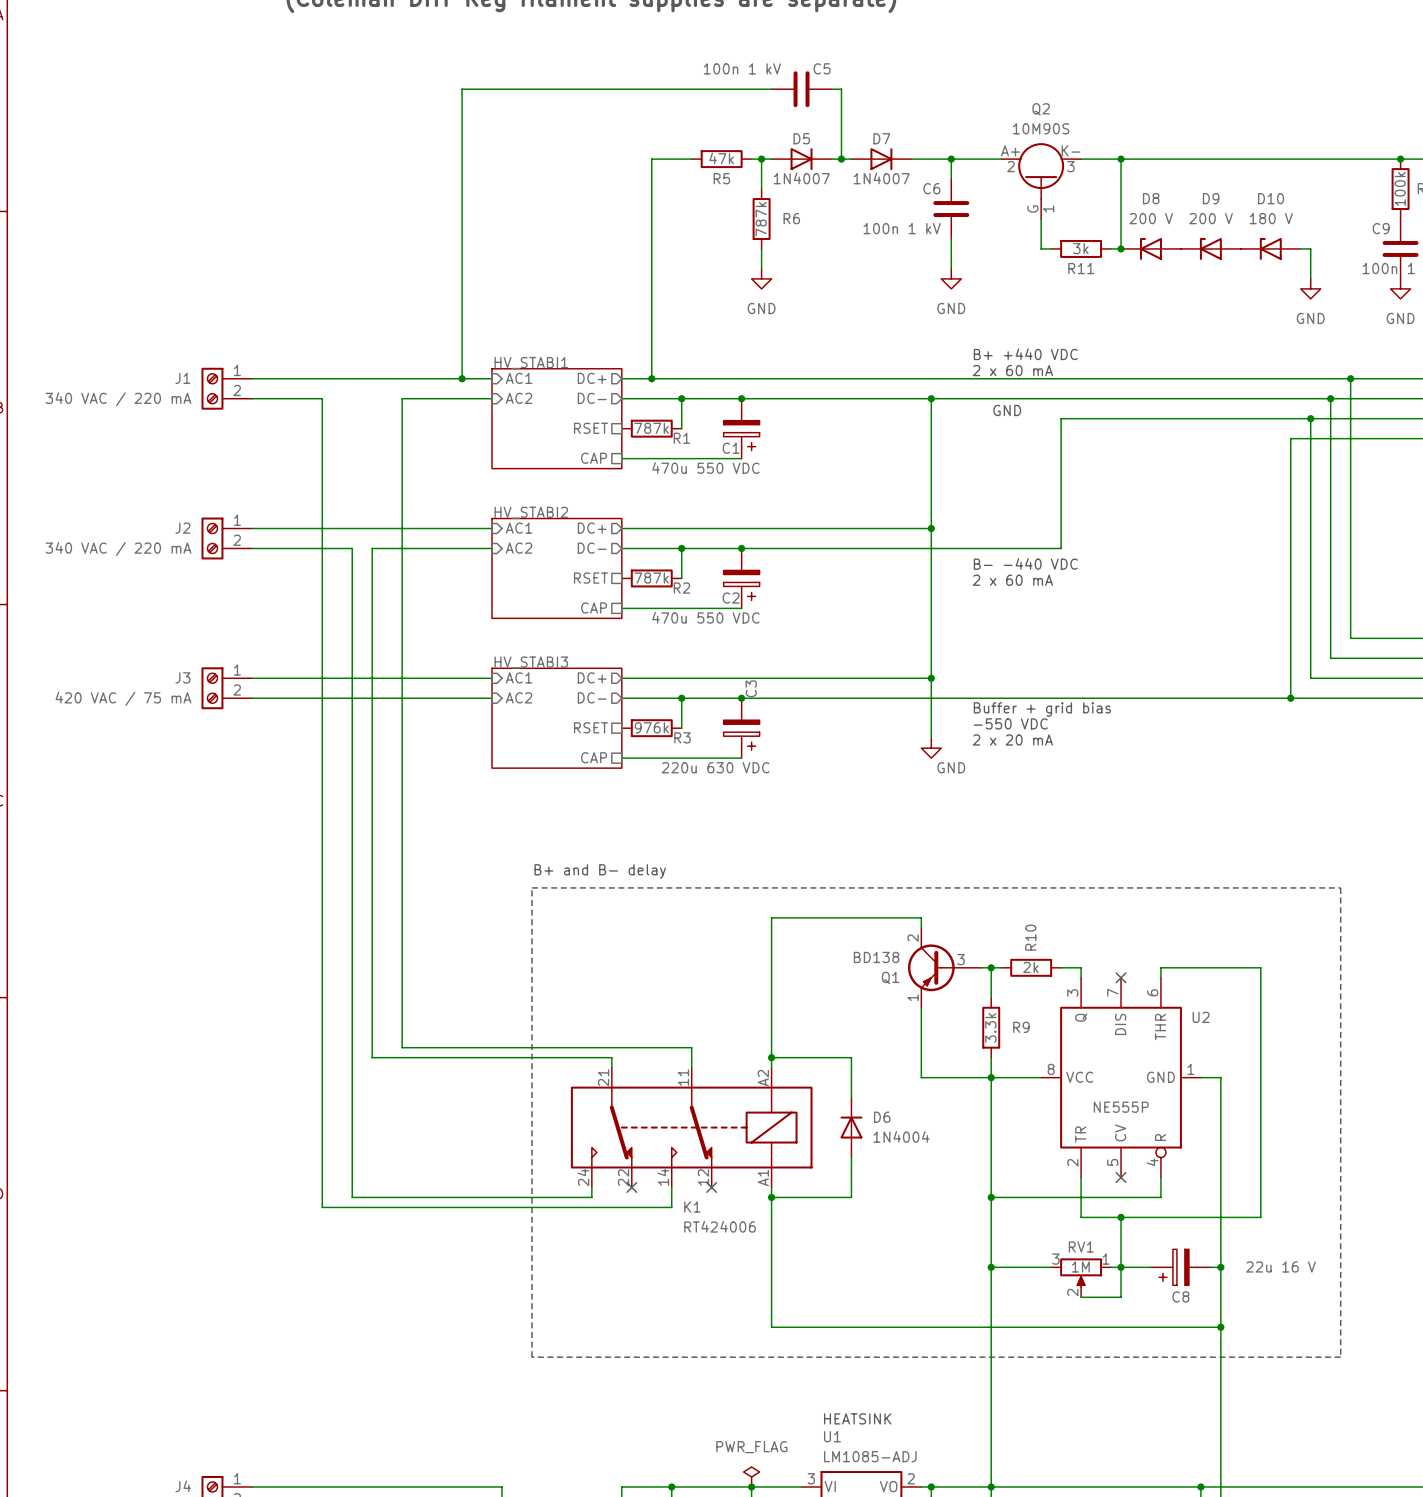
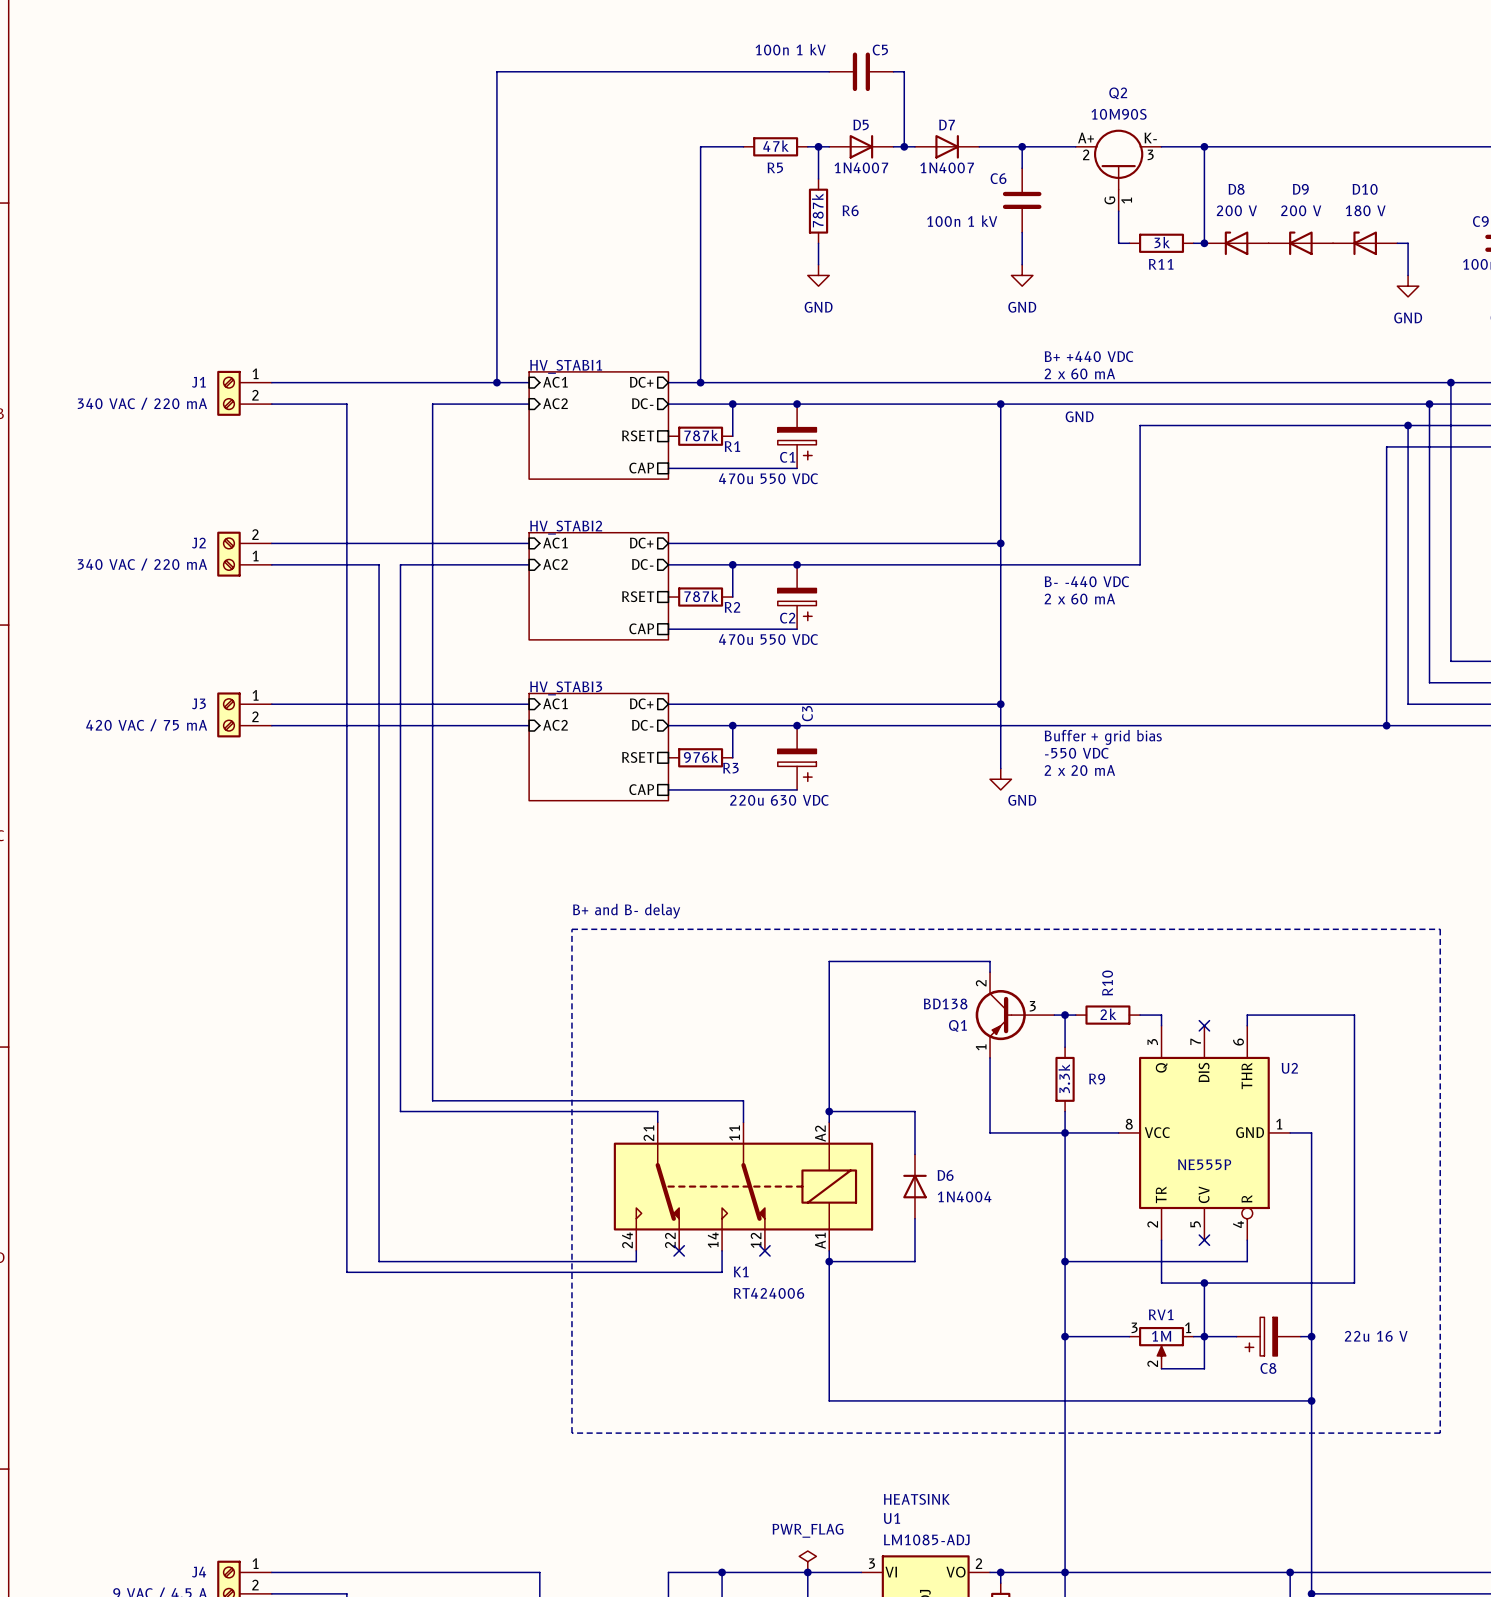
J2 flip: as is (212, 538) -> up-down (228, 554)

